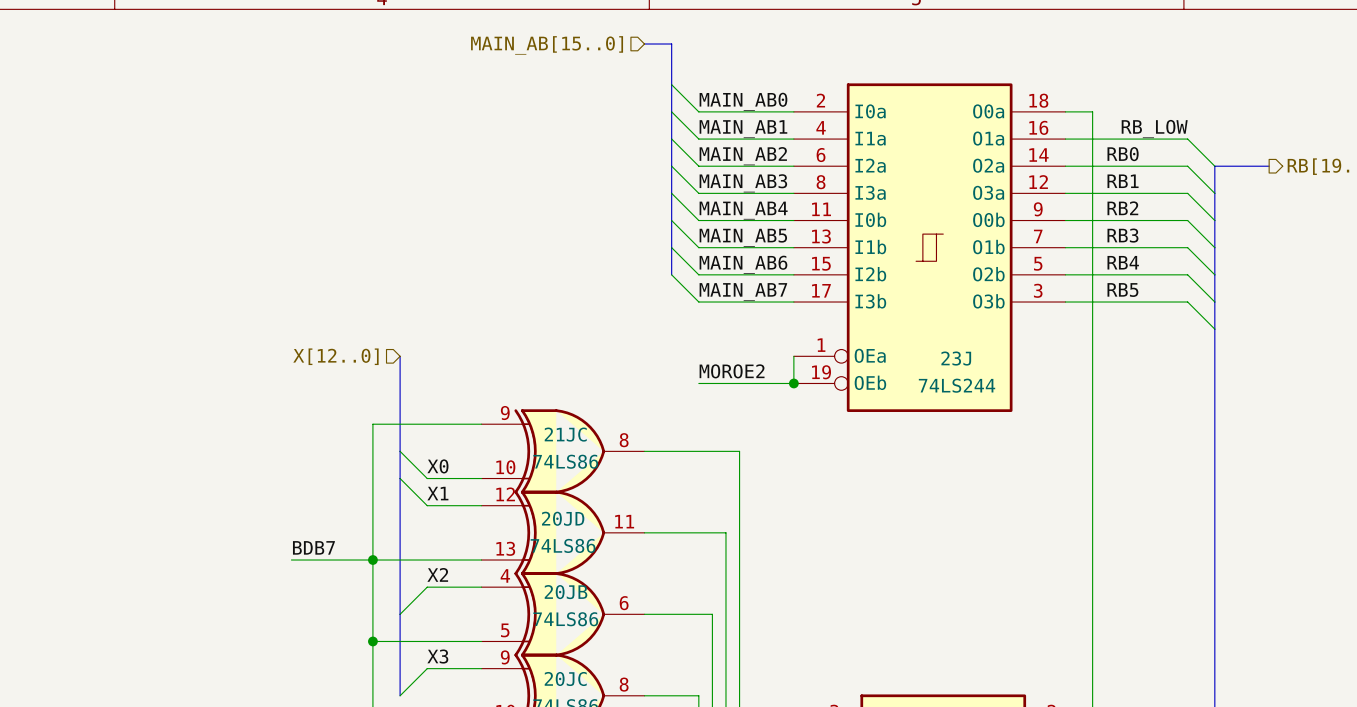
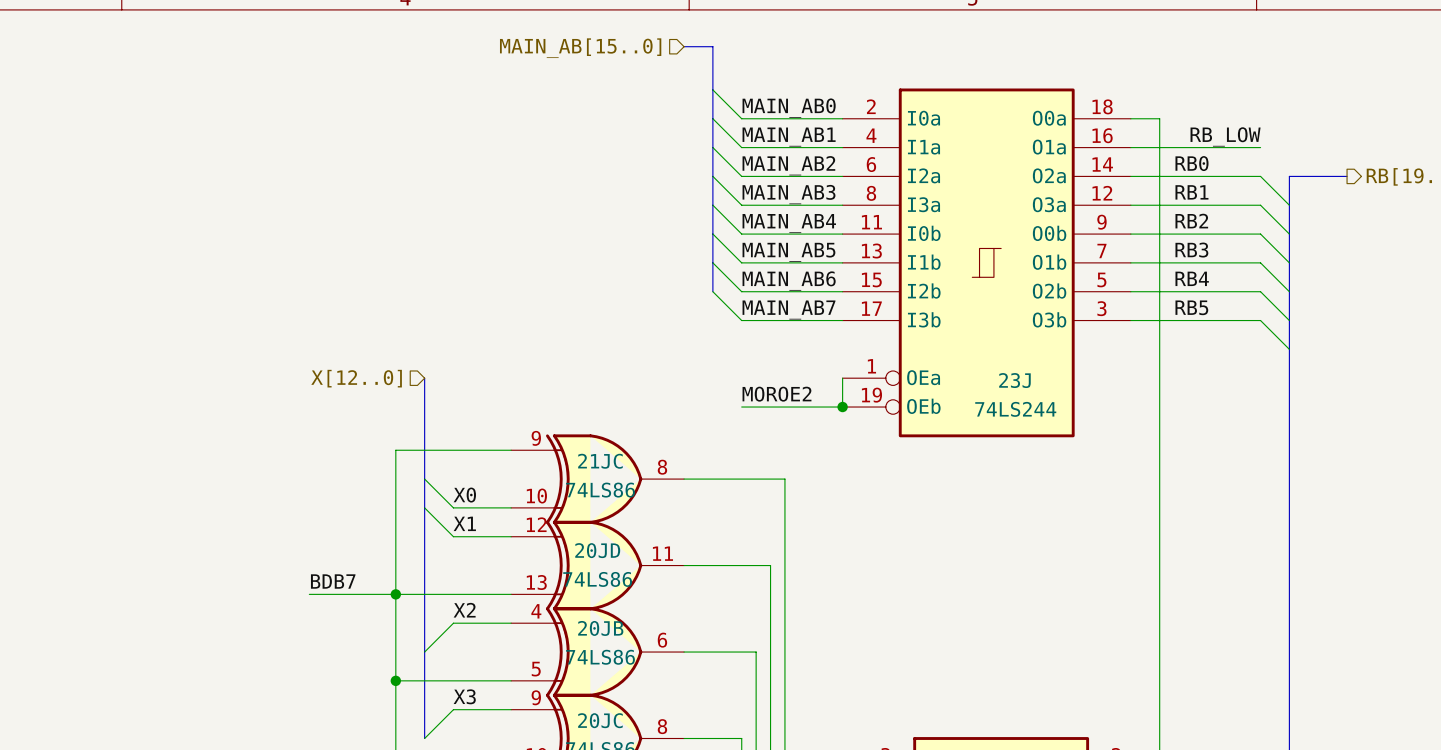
wire: (1187, 139) (1214, 166) -> none

